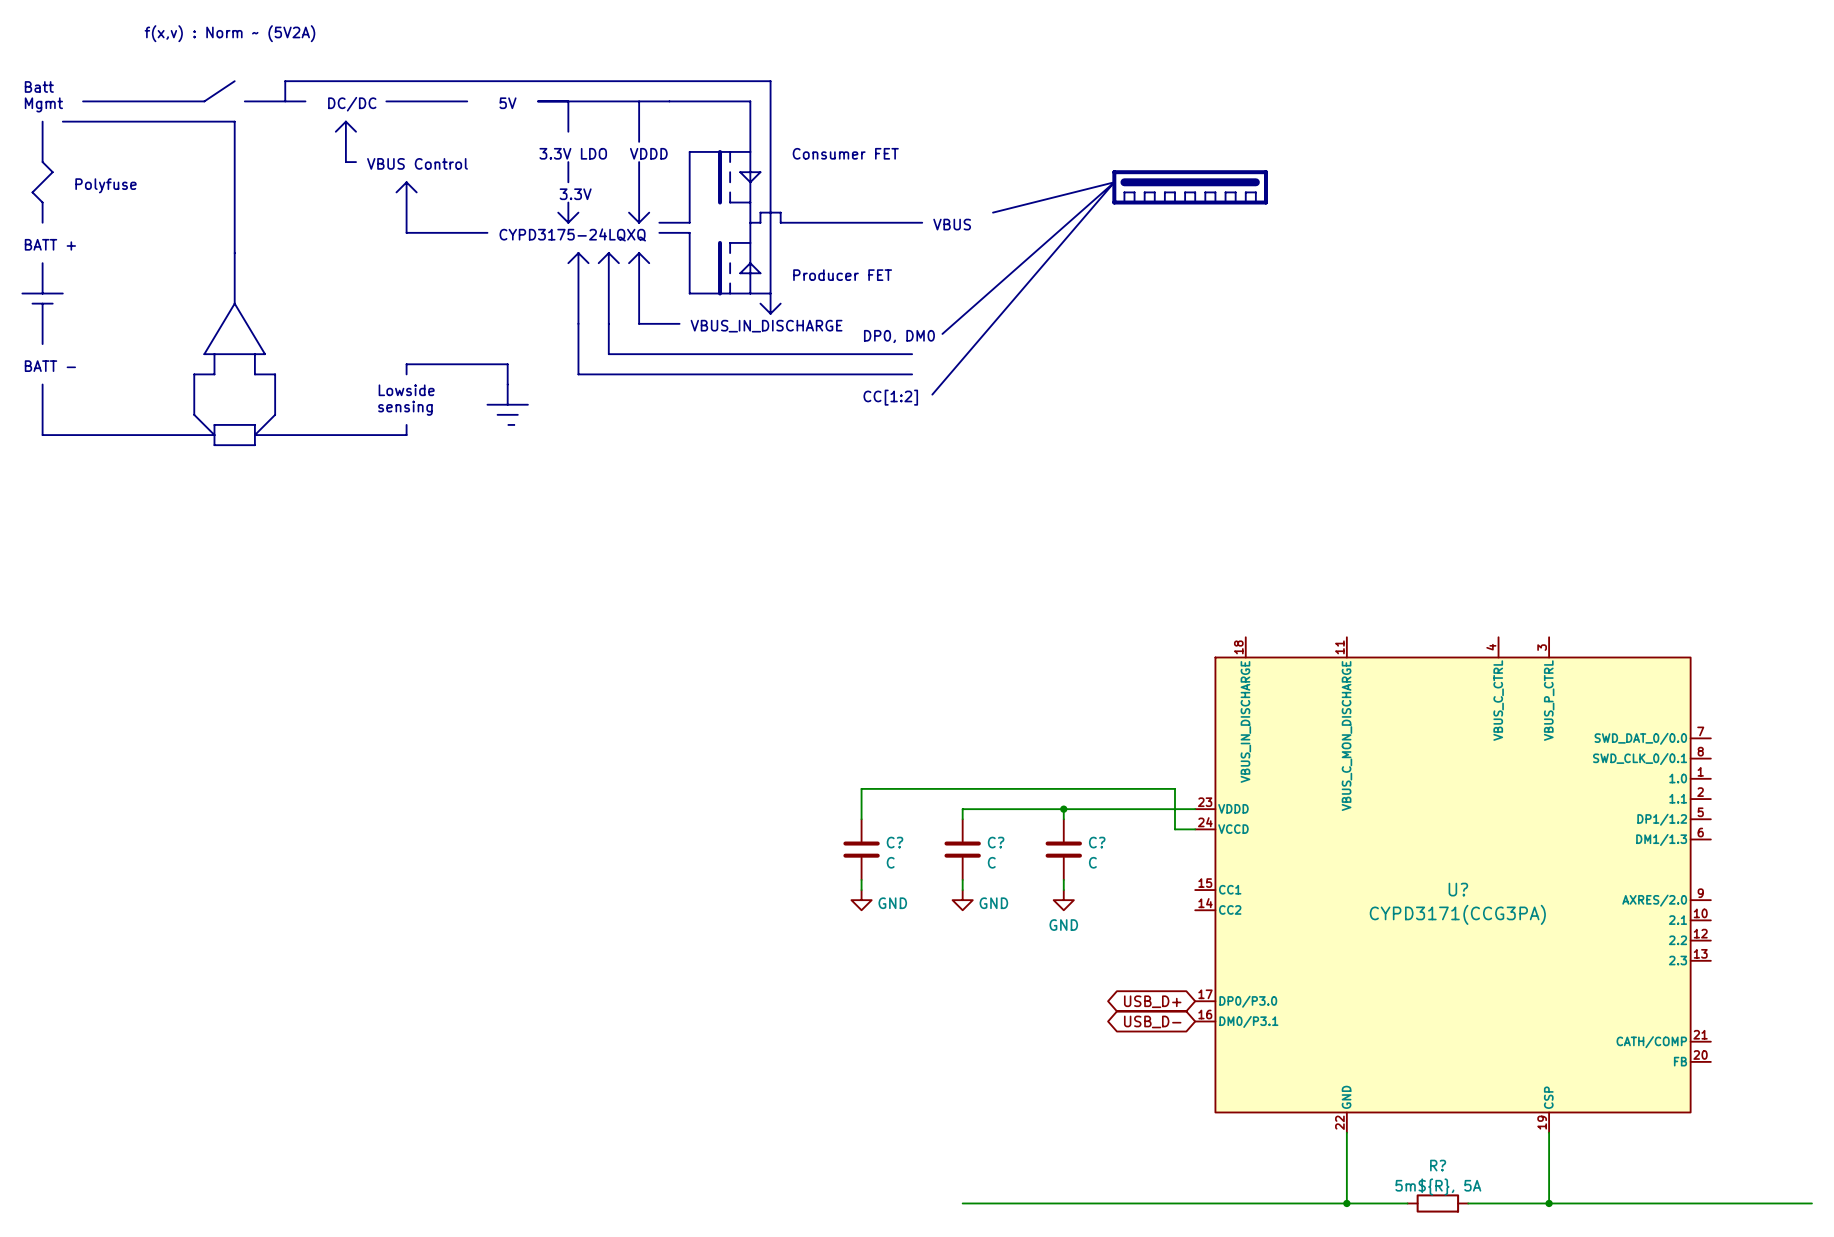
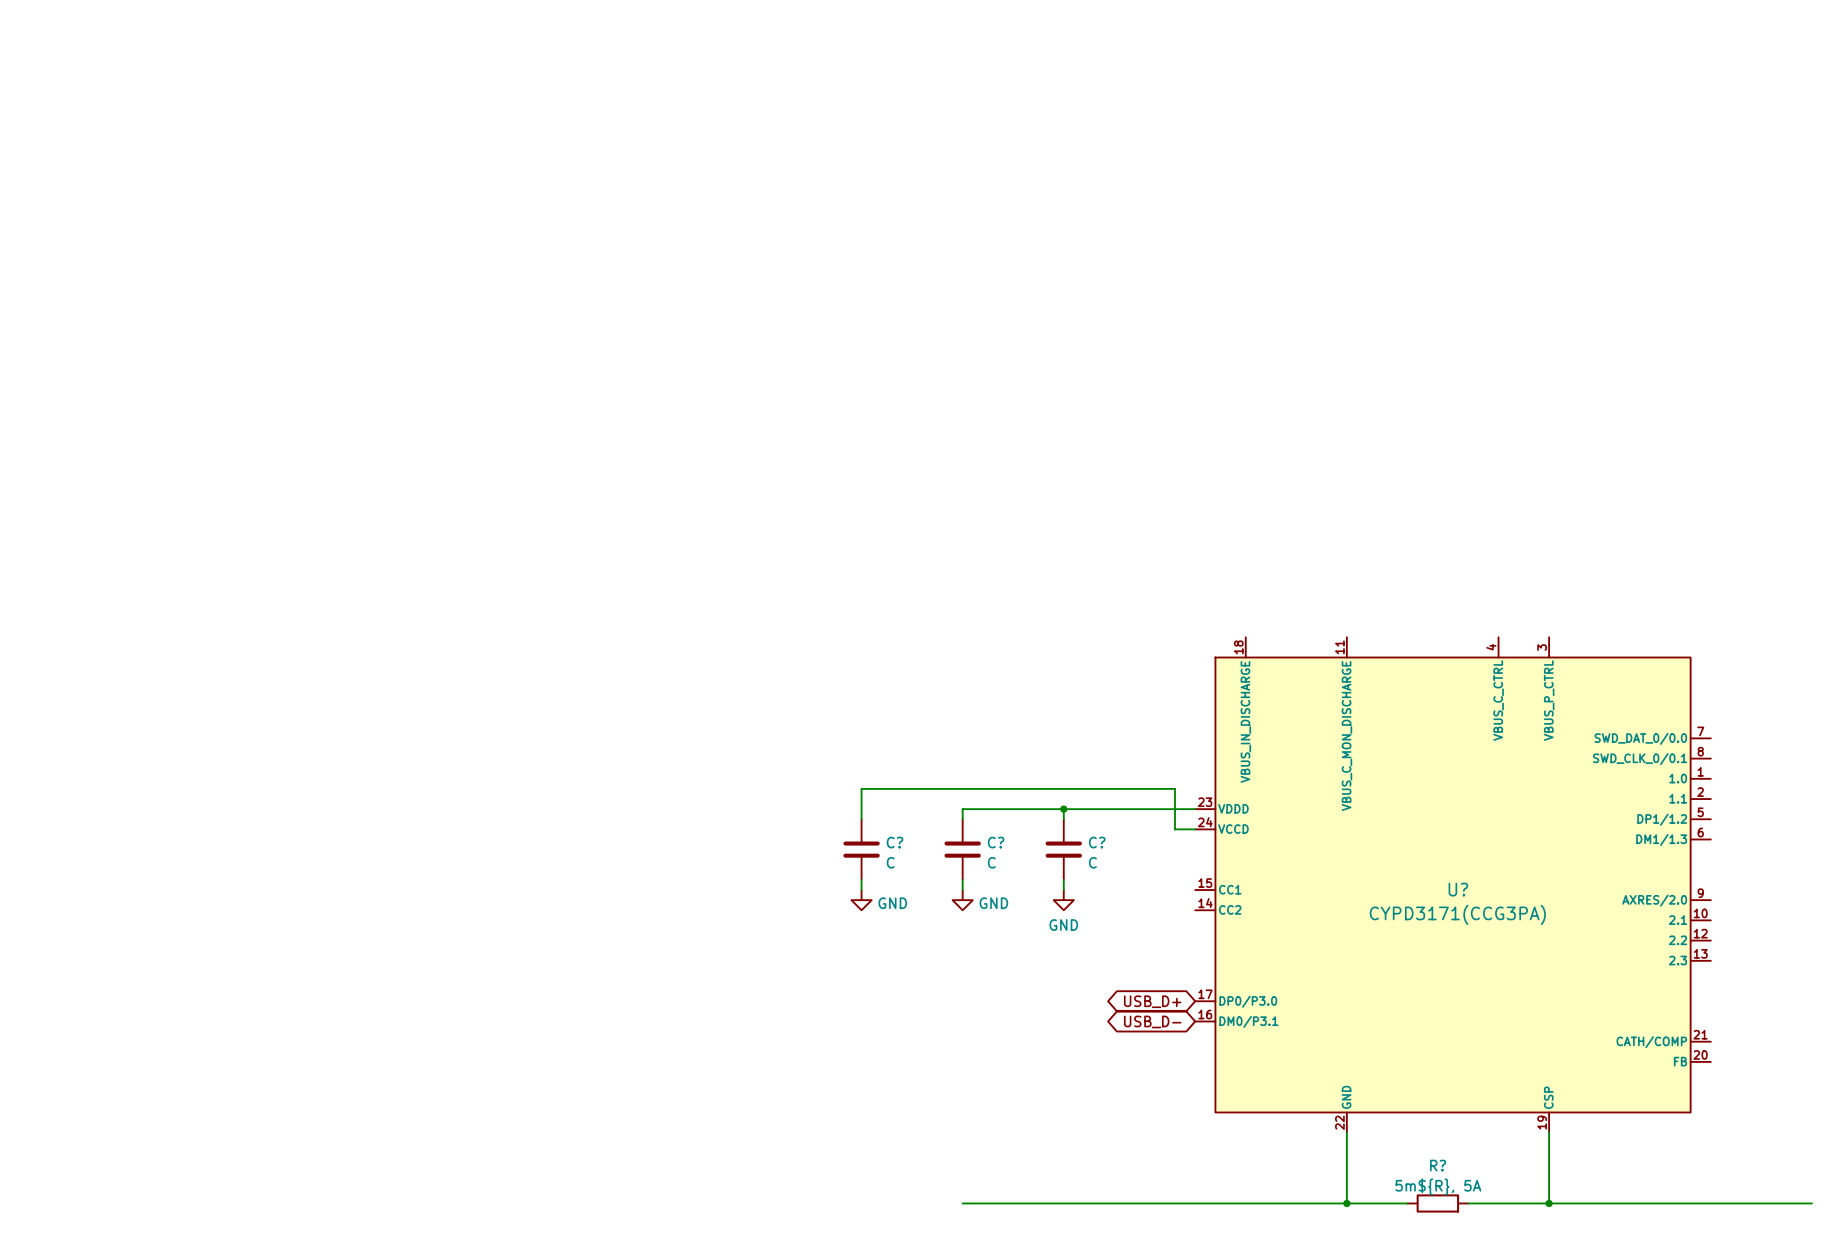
text: f(x,v) : Norm ~ (5V2A) (229, 33) -> none
line: (234, 81) (204, 101) (83, 101) -> none
text: Batt (39, 86) -> none
line: (244, 101) (305, 101) -> none
line: (285, 101) (285, 81) (770, 81) (770, 313) -> none
line: (386, 101) (467, 101) -> none
line: (538, 101) (750, 101) (750, 293) -> none
line: (568, 101) (568, 131) -> none
line: (639, 101) (639, 141) -> none
text: 5V (508, 103) -> none
text: Mgmt (43, 104) -> none
text: DC/DC (352, 104) -> none
line: (42, 121) (42, 162) (52, 172) (32, 192) (42, 202) (42, 222) -> none
line: (62, 121) (234, 121) (234, 303) -> none
line: (345, 121) (345, 162) (356, 162) -> none
line: (345, 121) (356, 131) -> none
line: (345, 121) (335, 131) -> none
line: (720, 151) (720, 202) -> none
line: (730, 151) (730, 162) -> none
line: (750, 151) (689, 151) (689, 222) (659, 222) -> none
text: 3.3V LDO (573, 153) -> none
text: VDDD (648, 153) -> none
text: Consumer FET (845, 153) -> none
line: (568, 162) (568, 182) -> none
line: (639, 162) (639, 222) -> none
text: VBUS Control (417, 163) -> none
line: (730, 172) (730, 182) -> none
line: (740, 172) (750, 182) (760, 172) (740, 172) -> none
line: (1114, 172) (1265, 172) (1265, 202) (1114, 202) (1114, 172) -> none
line: (406, 182) (406, 232) (487, 232) -> none
line: (406, 182) (416, 192) -> none
line: (406, 182) (396, 192) -> none
line: (1114, 182) (932, 394) -> none
line: (1114, 182) (942, 333) -> none
line: (1114, 182) (993, 212) -> none
line: (1124, 182) (1255, 182) -> none
text: Polyfuse (105, 185) -> none
line: (730, 192) (730, 202) (750, 202) -> none
text: 3.3V (575, 194) -> none
line: (568, 202) (568, 222) -> none
line: (1124, 202) (1124, 192) (1134, 192) (1134, 202) -> none
line: (1144, 202) (1144, 192) (1154, 192) (1154, 202) -> none
line: (1164, 202) (1164, 192) (1174, 192) (1174, 202) -> none
line: (1185, 202) (1185, 192) (1195, 192) (1195, 202) -> none
line: (1205, 202) (1205, 192) (1215, 192) (1215, 202) -> none
line: (1225, 202) (1225, 192) (1235, 192) (1235, 202) -> none
line: (1245, 202) (1245, 192) (1255, 192) (1255, 202) -> none
line: (558, 212) (568, 222) -> none
line: (578, 212) (568, 222) -> none
line: (629, 212) (639, 222) -> none
line: (649, 212) (639, 222) -> none
line: (750, 222) (760, 222) (760, 212) (780, 212) (780, 222) (922, 222) -> none
text: VBUS (952, 224) -> none
line: (659, 232) (689, 232) (689, 293) (770, 293) -> none
text: CYPD3175-24LQXQ (572, 234) -> none
line: (720, 242) (720, 293) -> none
line: (750, 242) (730, 242) (730, 253) -> none
text: BATT + (50, 244) -> none
line: (578, 253) (568, 263) -> none
line: (578, 253) (578, 374) (912, 374) -> none
line: (578, 253) (588, 263) -> none
line: (608, 253) (598, 263) -> none
line: (608, 253) (608, 354) (912, 354) -> none
line: (608, 253) (618, 263) -> none
line: (639, 253) (629, 263) -> none
line: (639, 253) (639, 323) (679, 323) -> none
line: (639, 253) (649, 263) -> none
line: (42, 263) (42, 293) -> none
line: (730, 263) (730, 273) -> none
line: (750, 263) (760, 273) (740, 273) (750, 263) -> none
text: Producer FET (842, 275) -> none
line: (730, 283) (730, 293) -> none
line: (22, 293) (62, 293) -> none
line: (32, 303) (52, 303) -> none
line: (42, 303) (42, 344) -> none
line: (234, 303) (204, 354) (265, 354) (234, 303) -> none
line: (760, 303) (770, 313) -> none
line: (780, 303) (770, 313) -> none
text: VBUS_IN_DISCHARGE (766, 326) -> none
text: DP0, DM0 (899, 336) -> none
line: (214, 354) (214, 374) (194, 374) (194, 414) (214, 435) (42, 435) (42, 384) -> none
line: (254, 354) (254, 374) (275, 374) (275, 414) (254, 435) (406, 435) (406, 424) -> none
text: BATT - (50, 366) -> none
line: (406, 374) (406, 364) (507, 364) (507, 404) -> none
text: Lowside (406, 390) -> none
text: CC[1:2] (890, 397) -> none
line: (487, 404) (527, 404) -> none
text: sensing (405, 408) -> none
line: (497, 414) (517, 414) -> none
line: (214, 424) (214, 445) (254, 445) (254, 424) (214, 424) -> none
line: (507, 424) (517, 424) -> none

